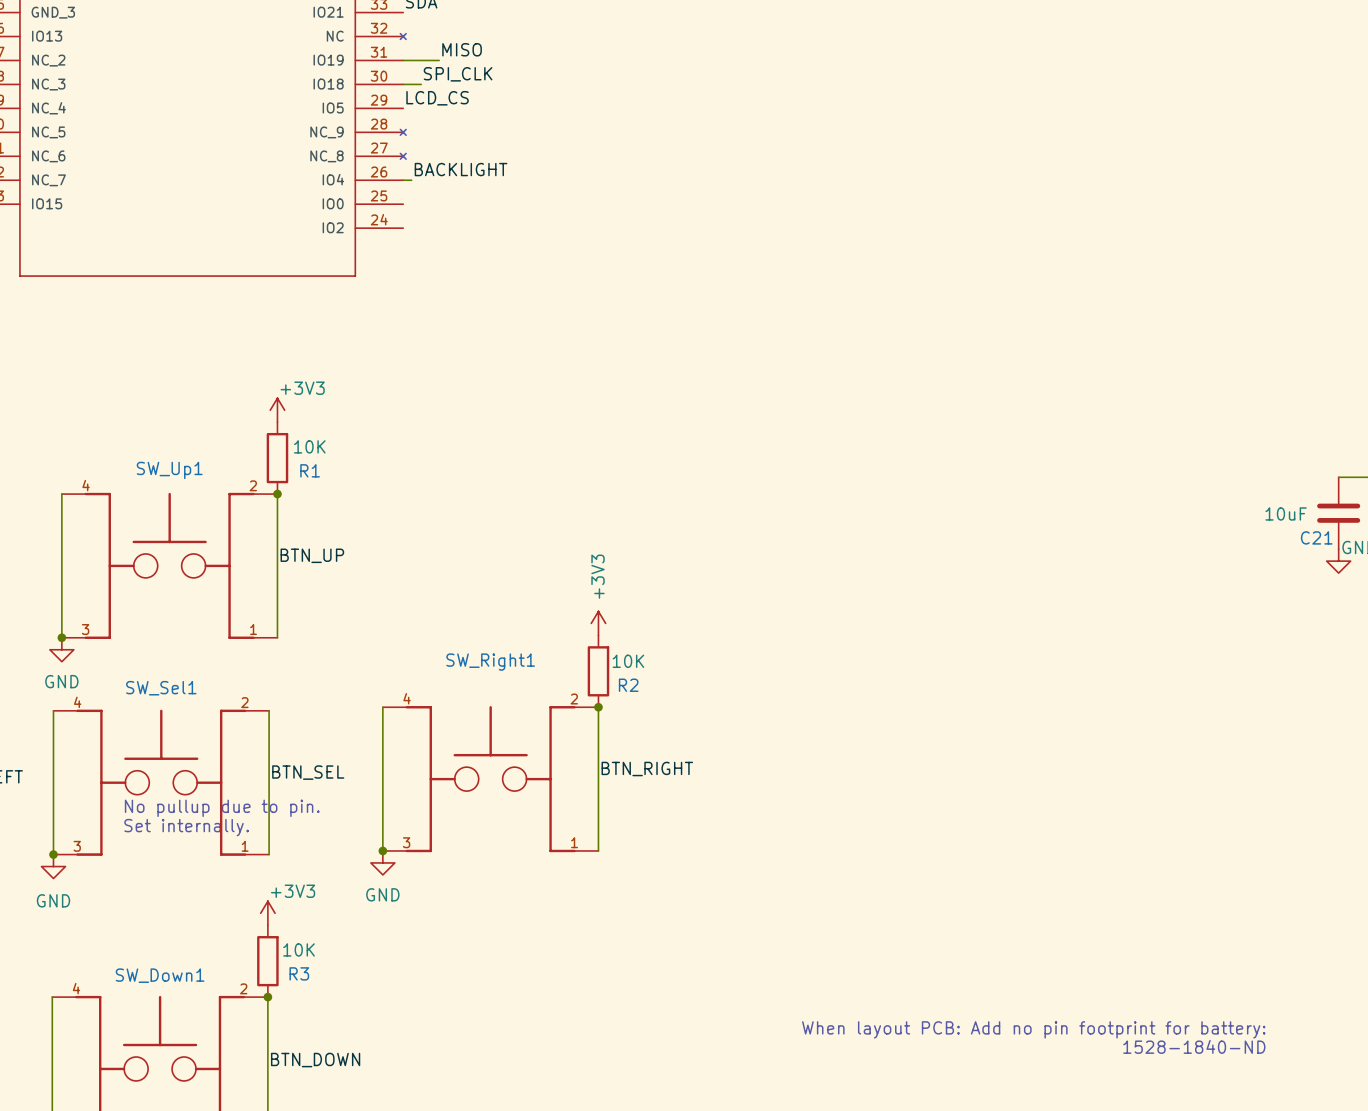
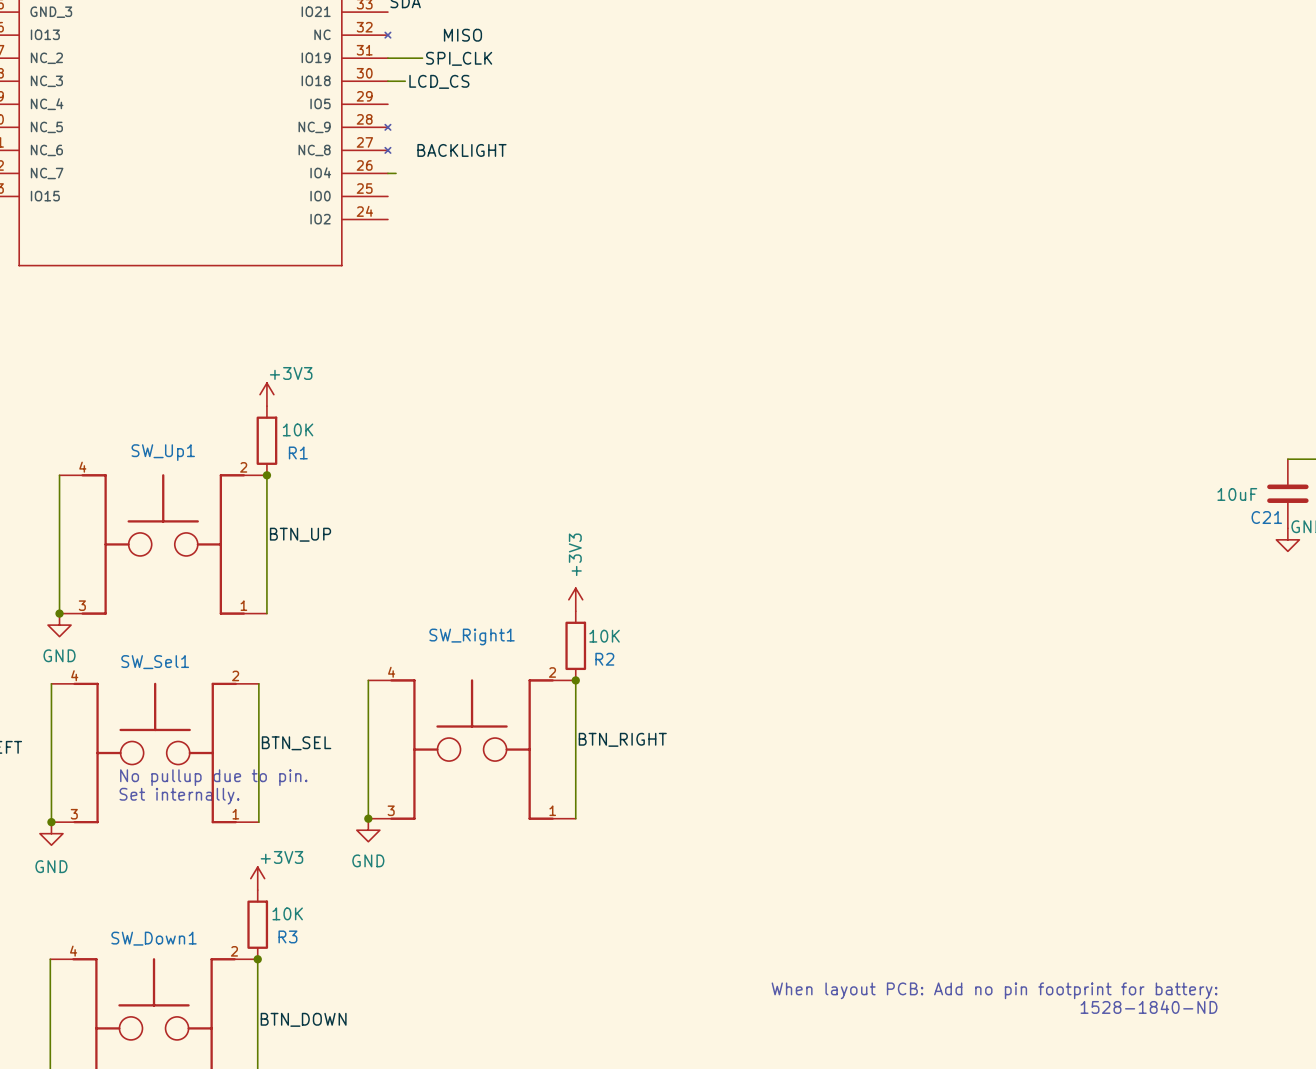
label position: MISO (462, 49) -> MISO (462, 35)
label position: SPI_CLK (458, 74) -> SPI_CLK (459, 58)
label position: LCD_CS (437, 98) -> LCD_CS (439, 81)
label position: BACKLIGHT (461, 169) -> BACKLIGHT (461, 150)

